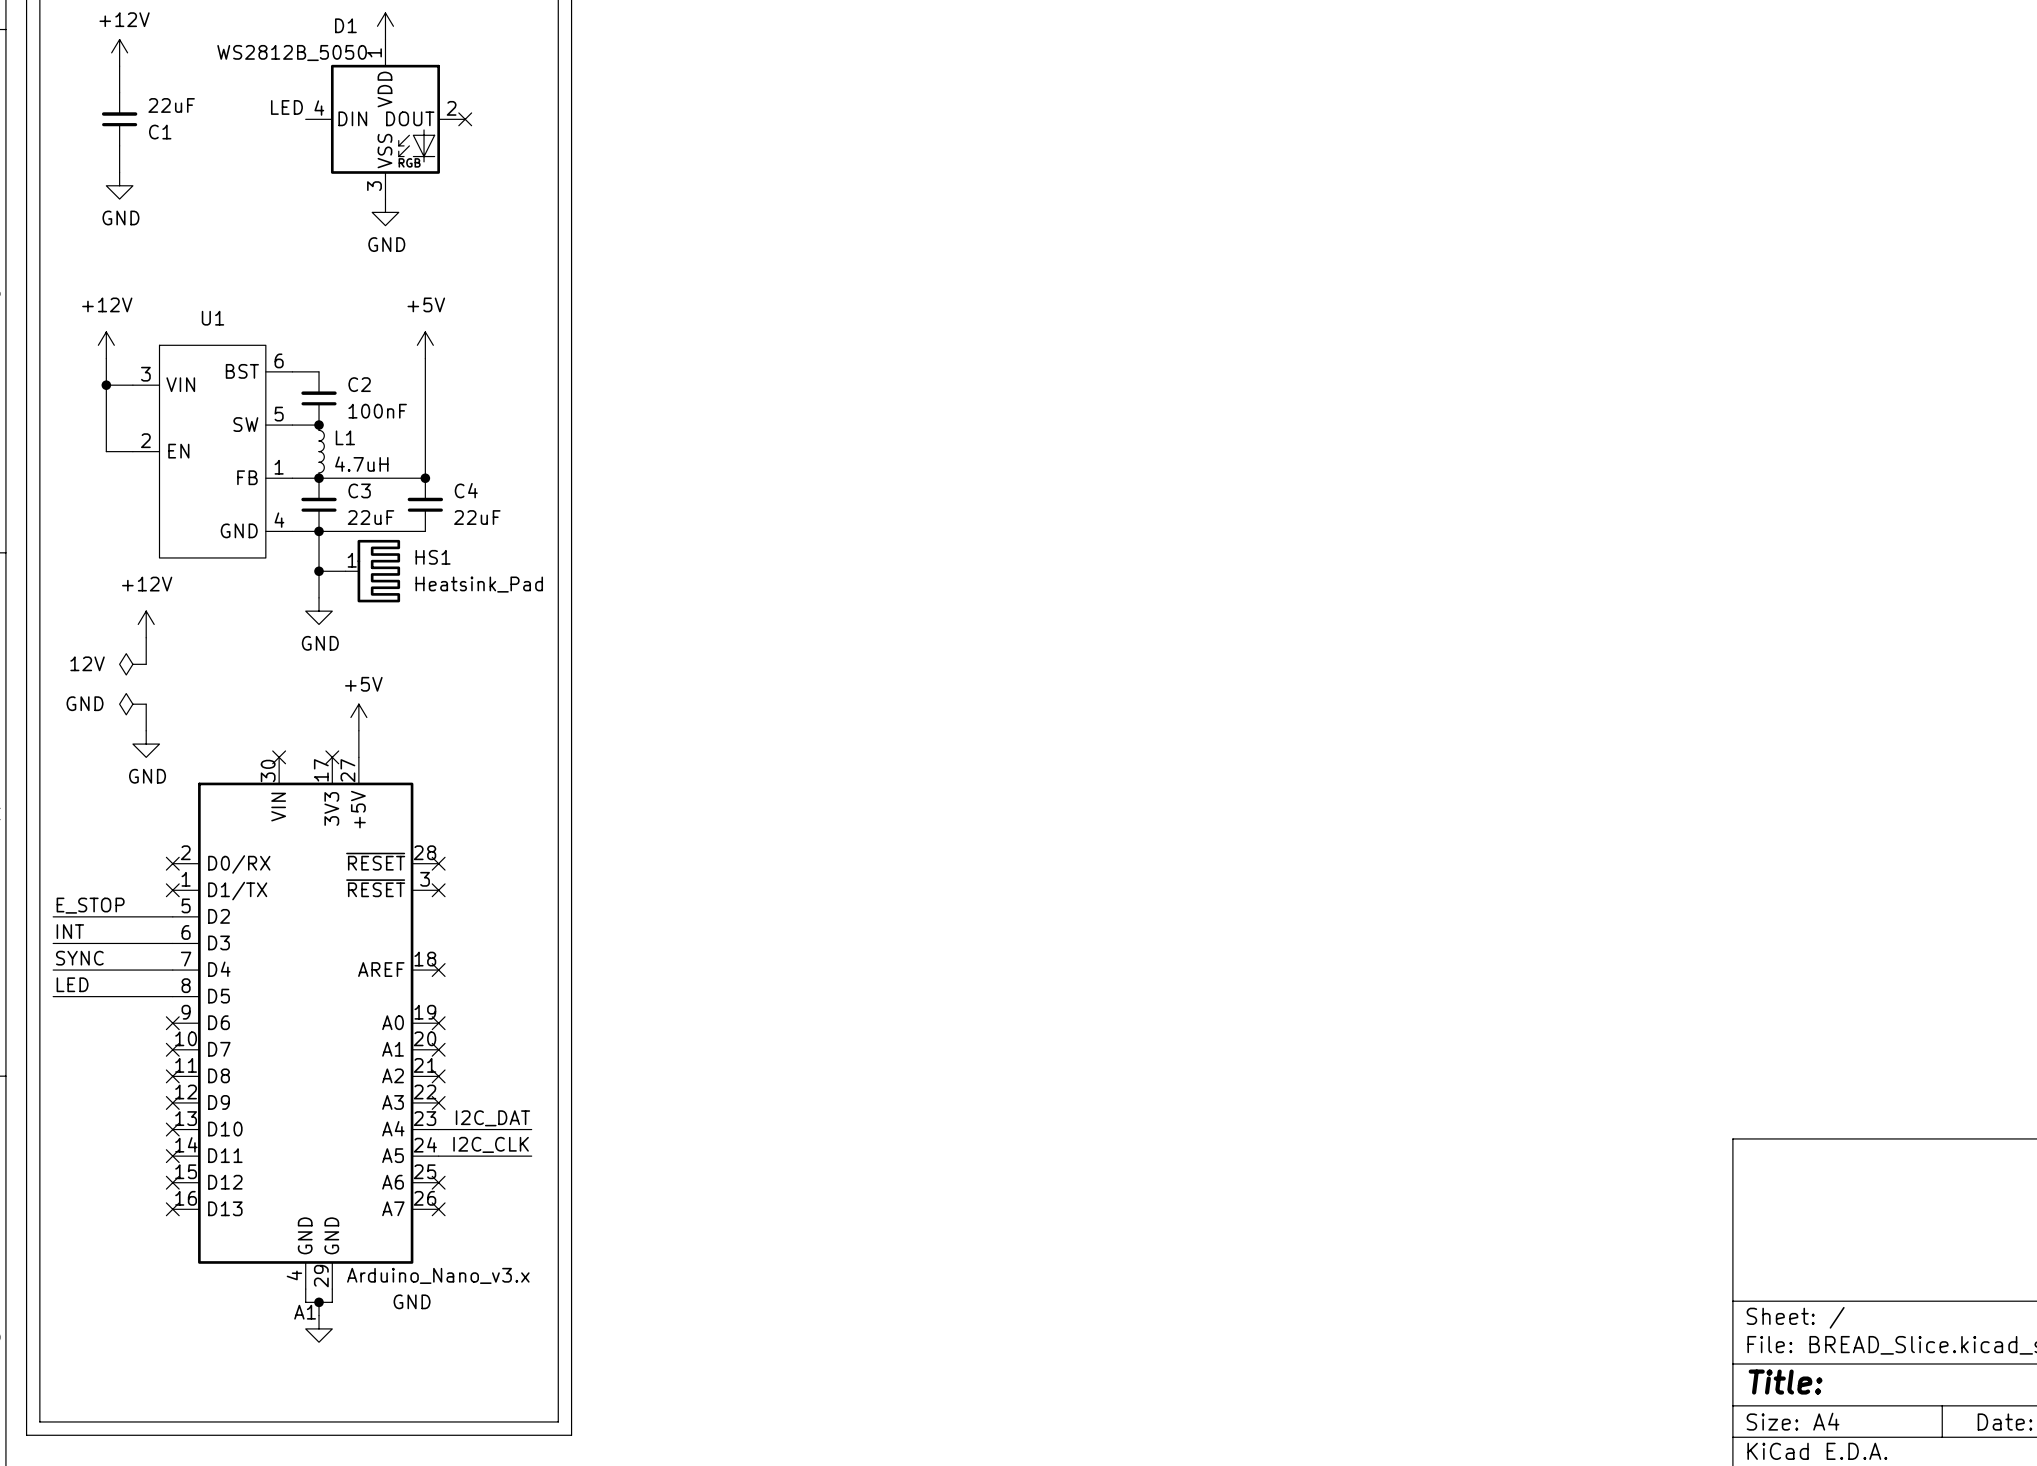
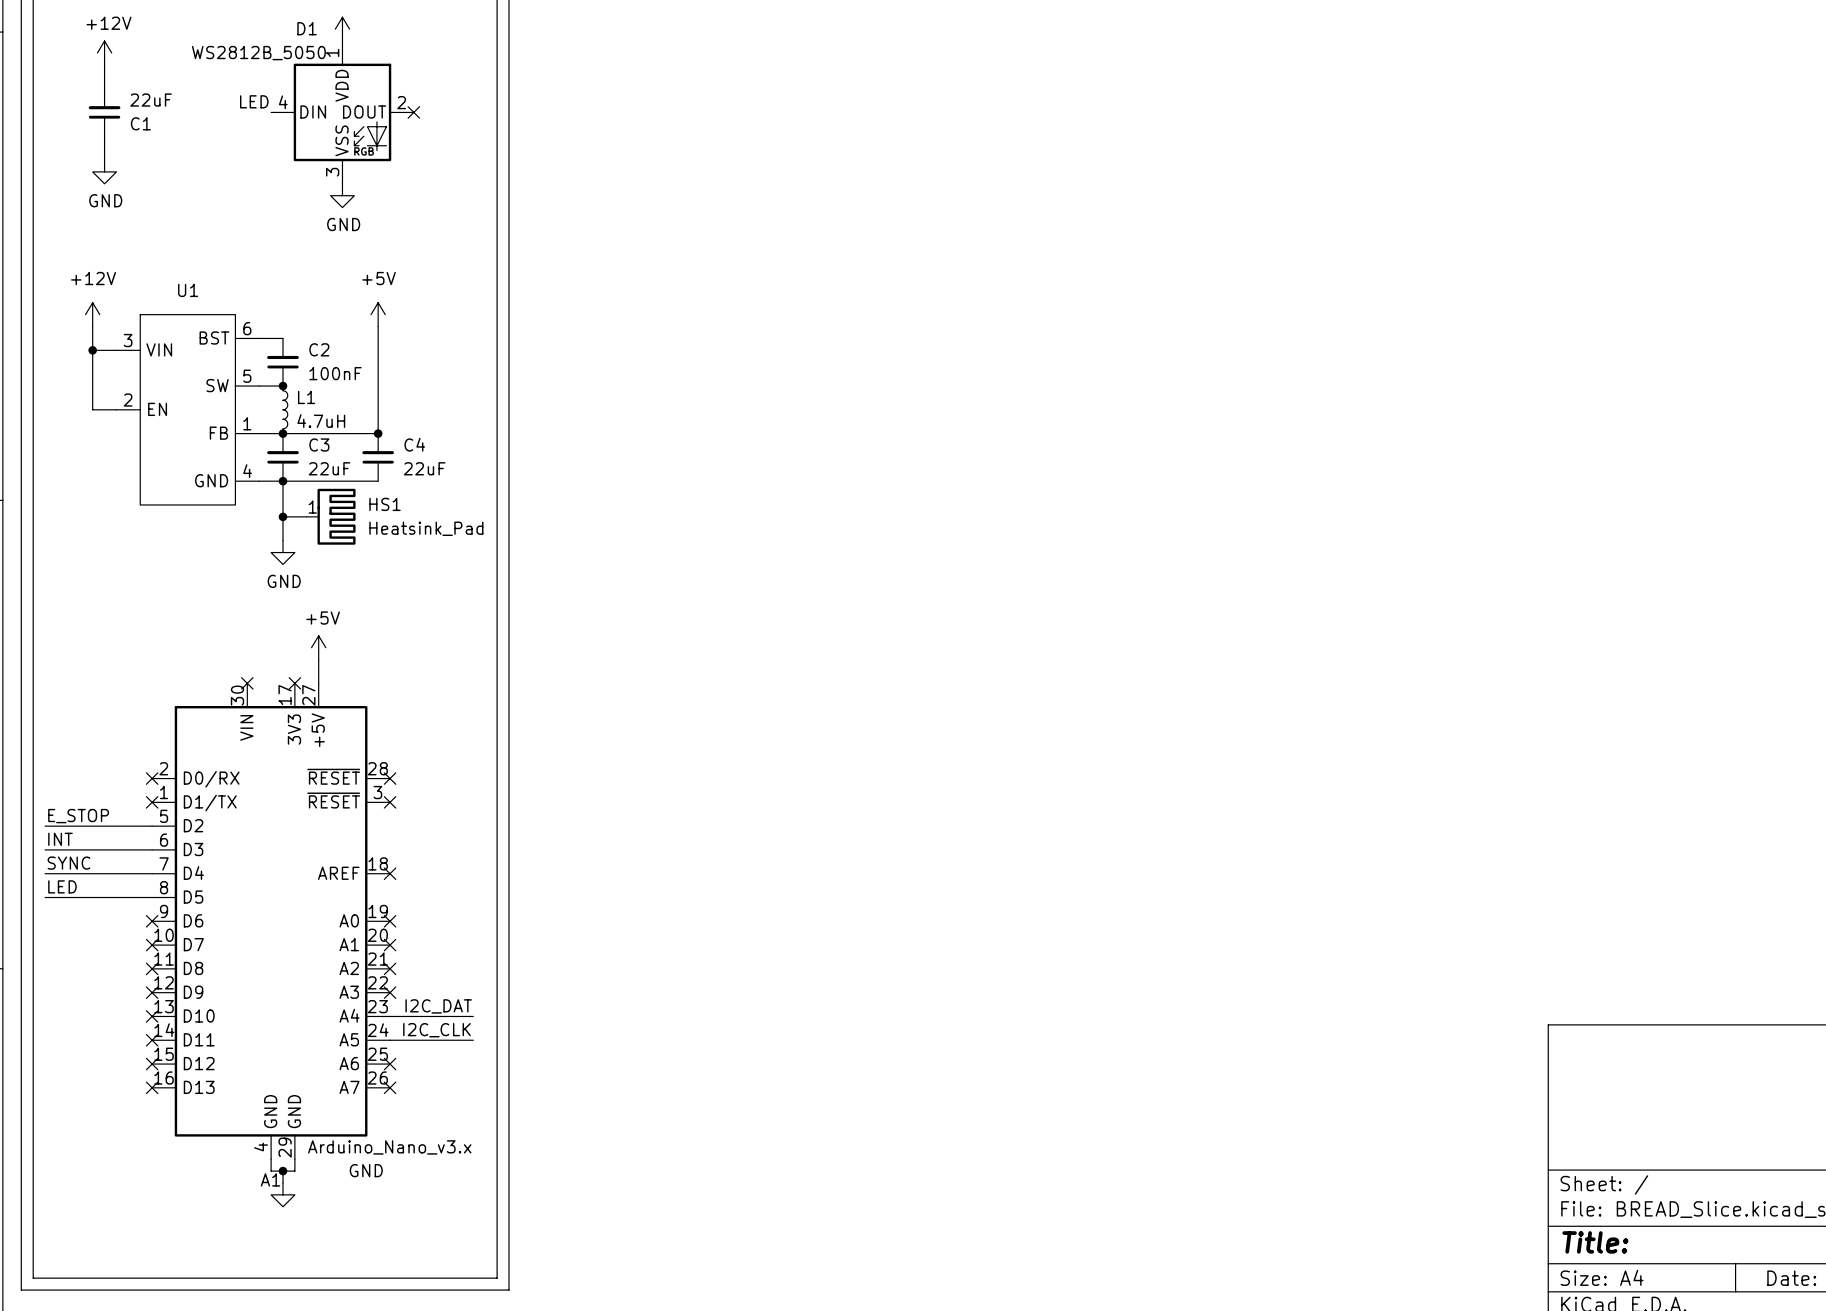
power symbol: +12V (146, 624) -> none
wire: (146, 637) (146, 664) -> none
power symbol: 12V (132, 664) -> none
power symbol: GND (132, 704) -> none
wire: (146, 704) (146, 730) -> none
power symbol: GND (146, 744) -> none

